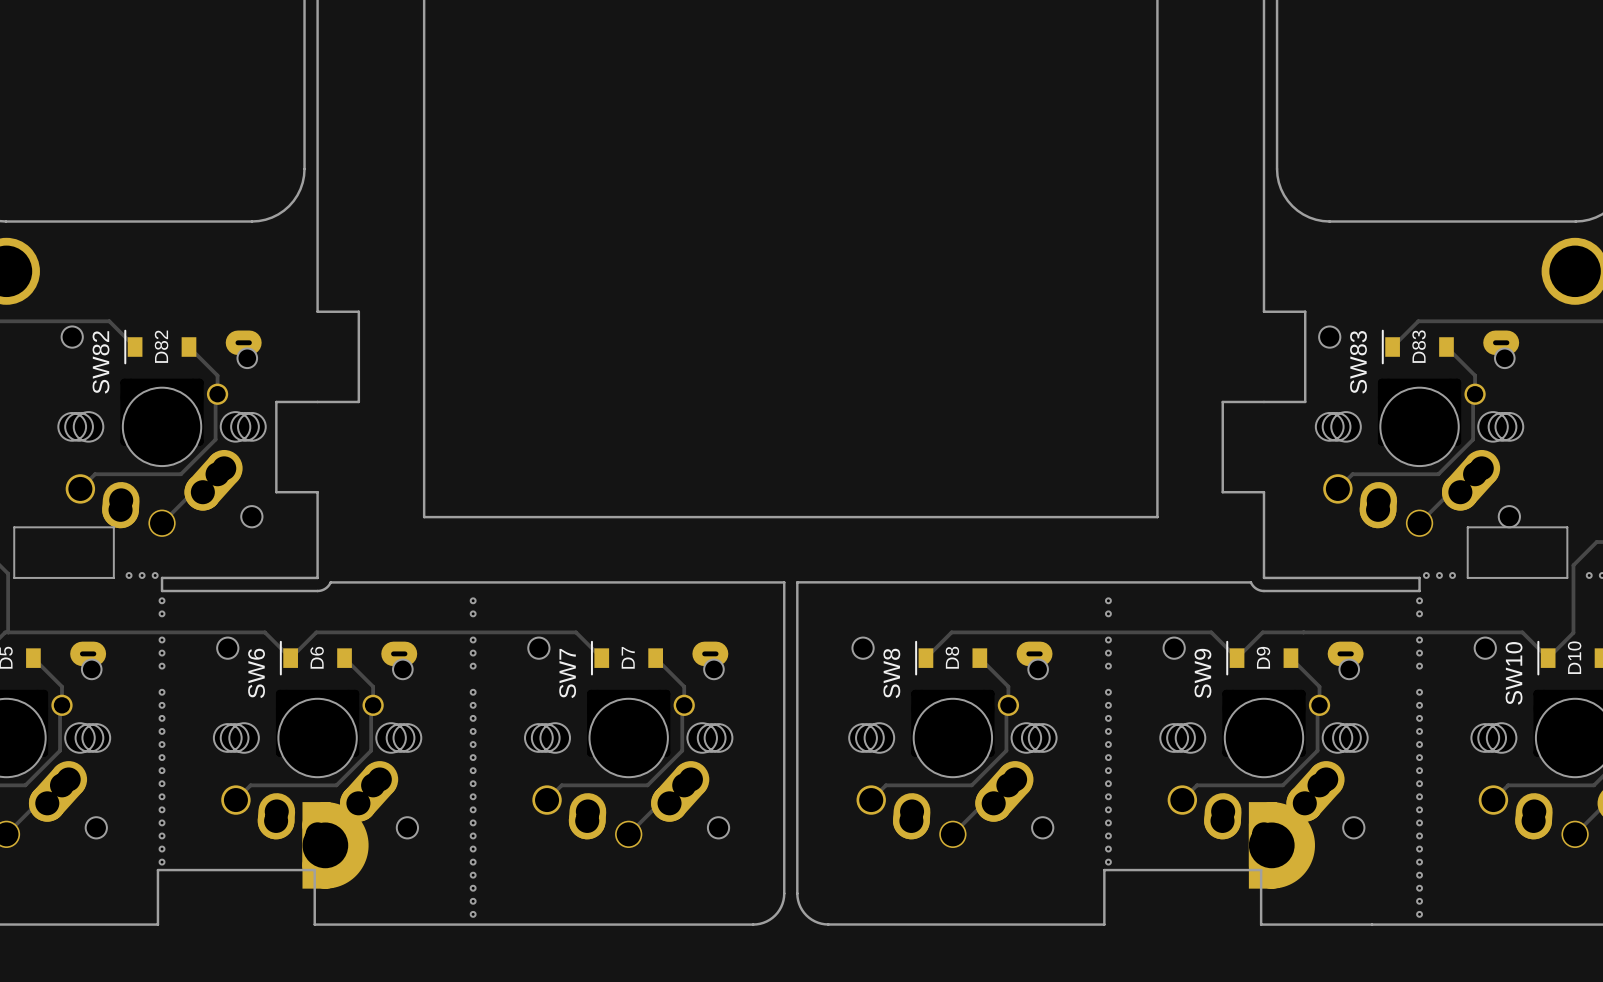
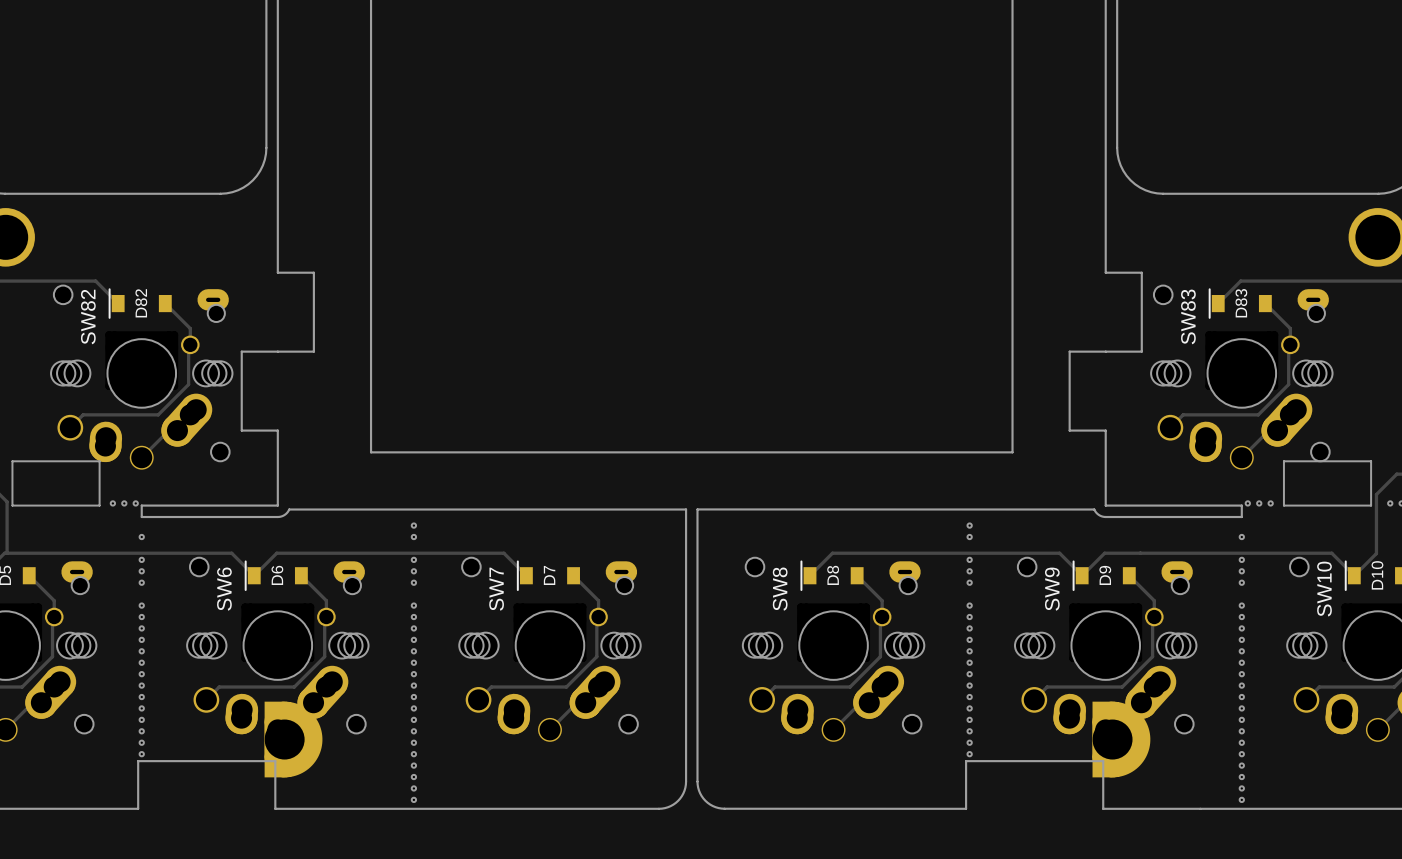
part footprint: [159, 598, 165, 865] -> [139, 534, 144, 757]
part footprint: [1417, 598, 1422, 917] -> [1239, 534, 1244, 803]

